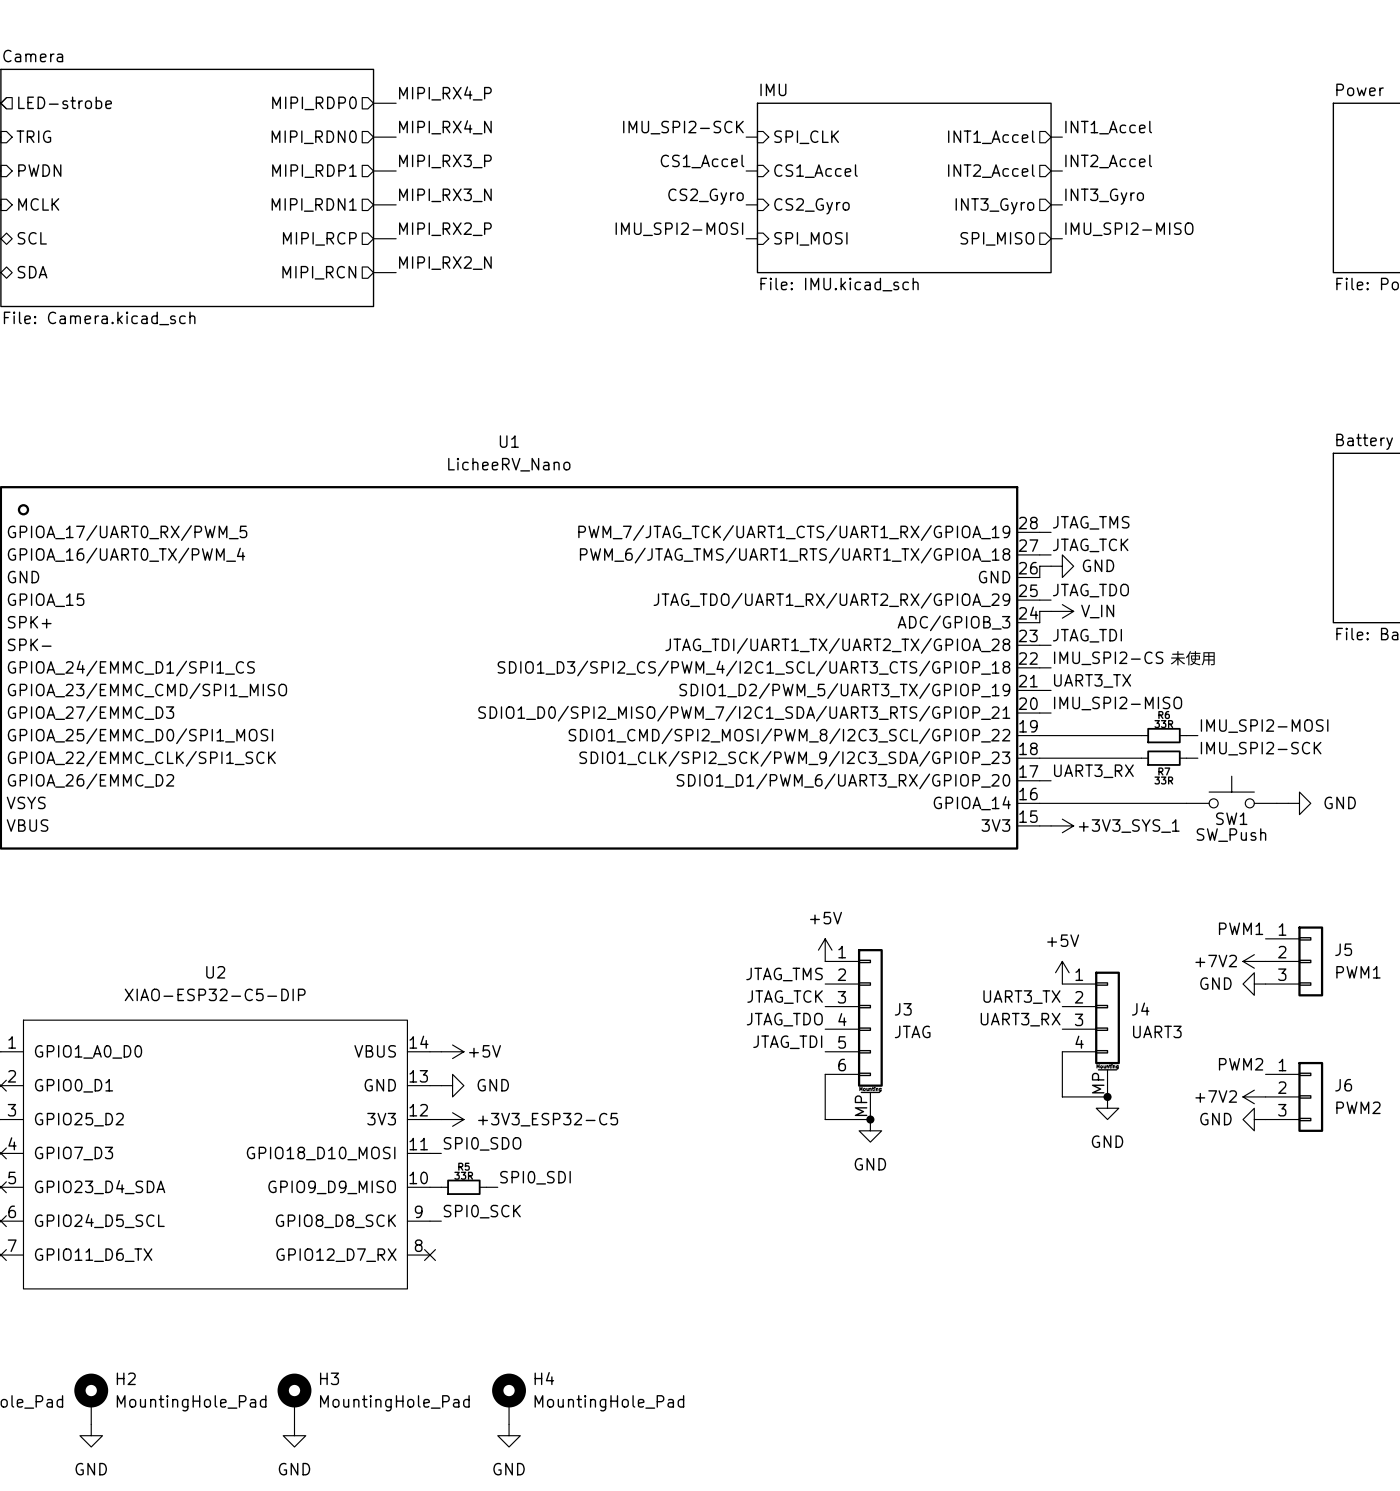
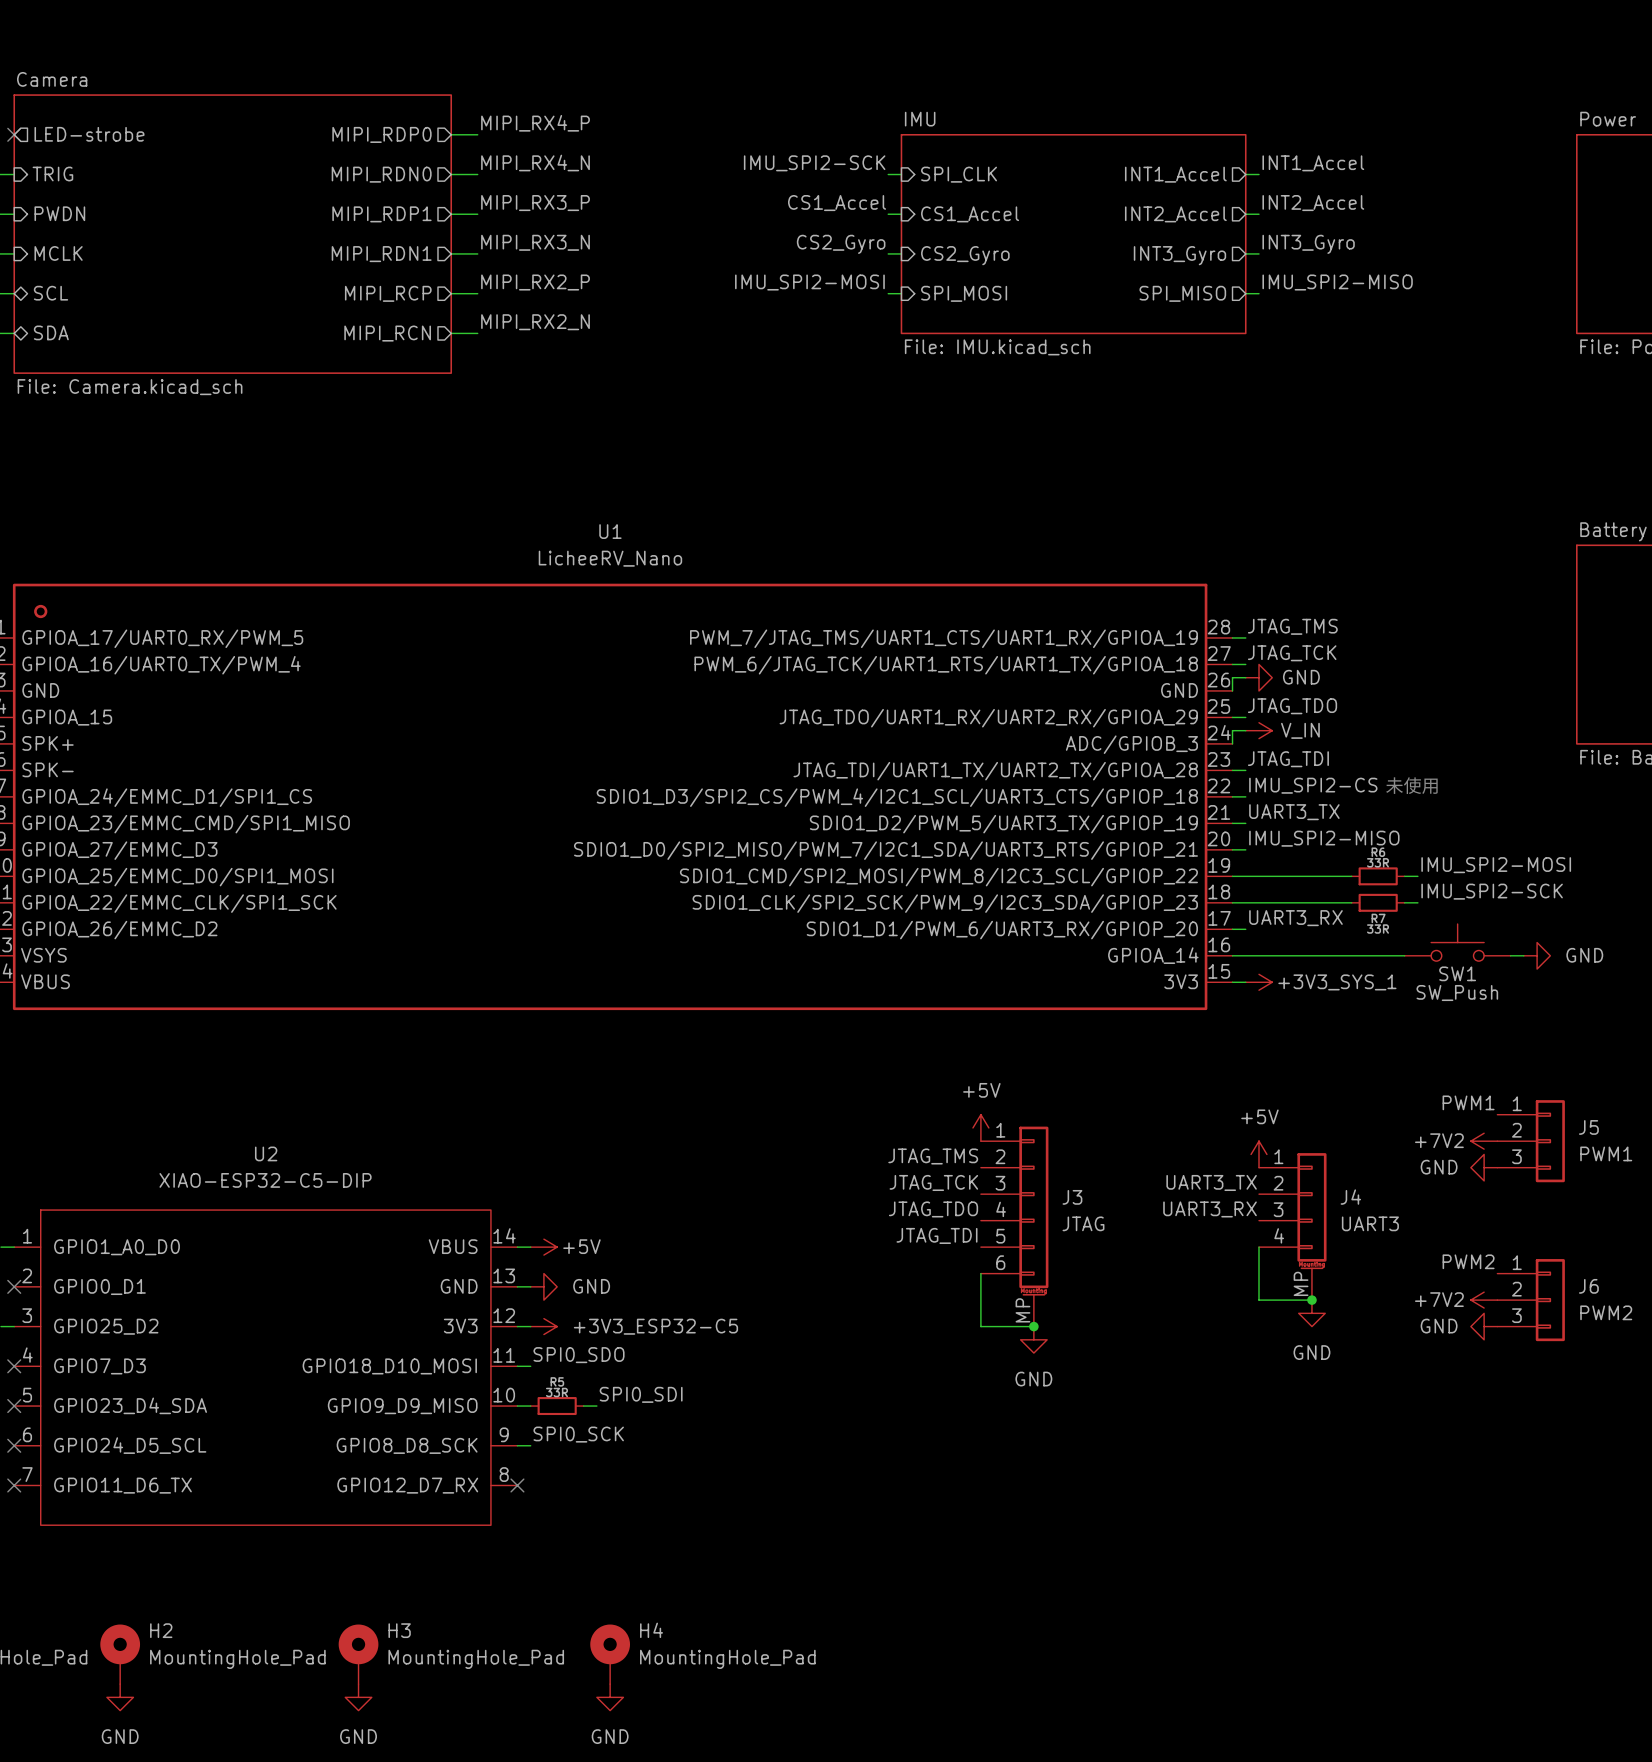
U1 pin name: PWM_7/JTAG_TCK/UART1_CTS/UART1_RX/GPIOA_19 (794, 533) -> PWM_7/JTAG_TMS/UART1_CTS/UART1_RX/GPIOA_19 (943, 638)
U1 pin name: PWM_6/JTAG_TMS/UART1_RTS/UART1_TX/GPIOA_18 (795, 555) -> PWM_6/JTAG_TCK/UART1_RTS/UART1_TX/GPIOA_18 (946, 665)

